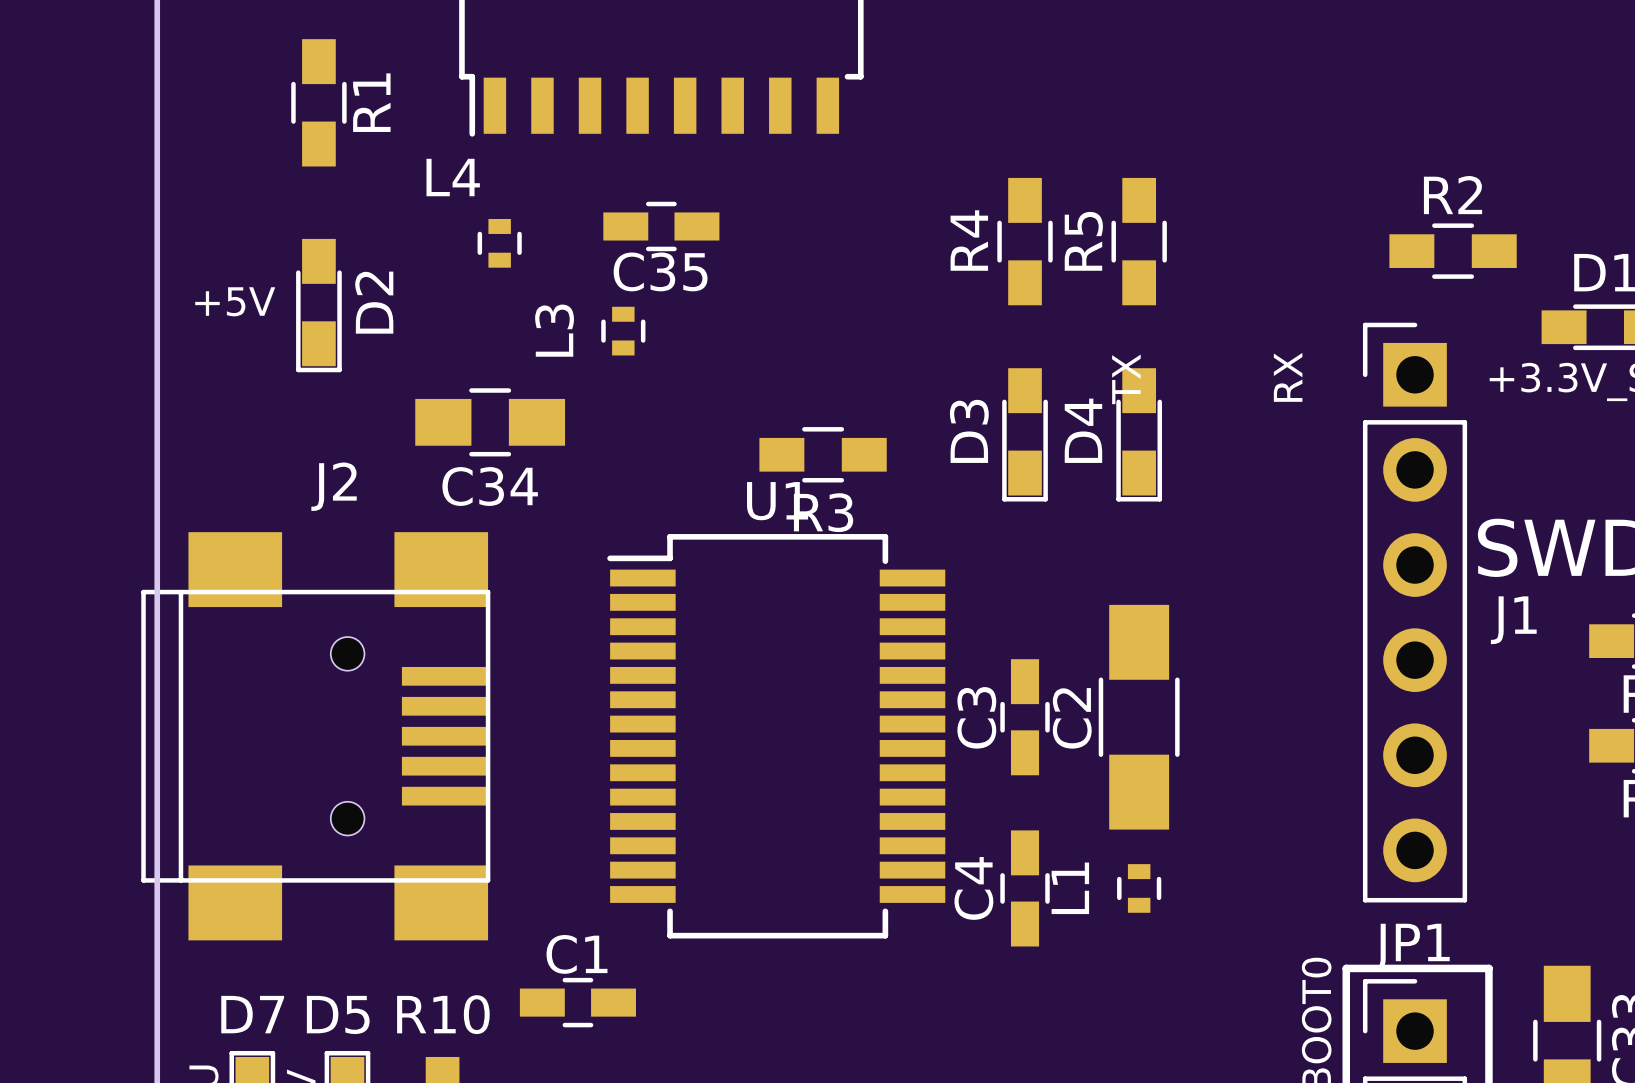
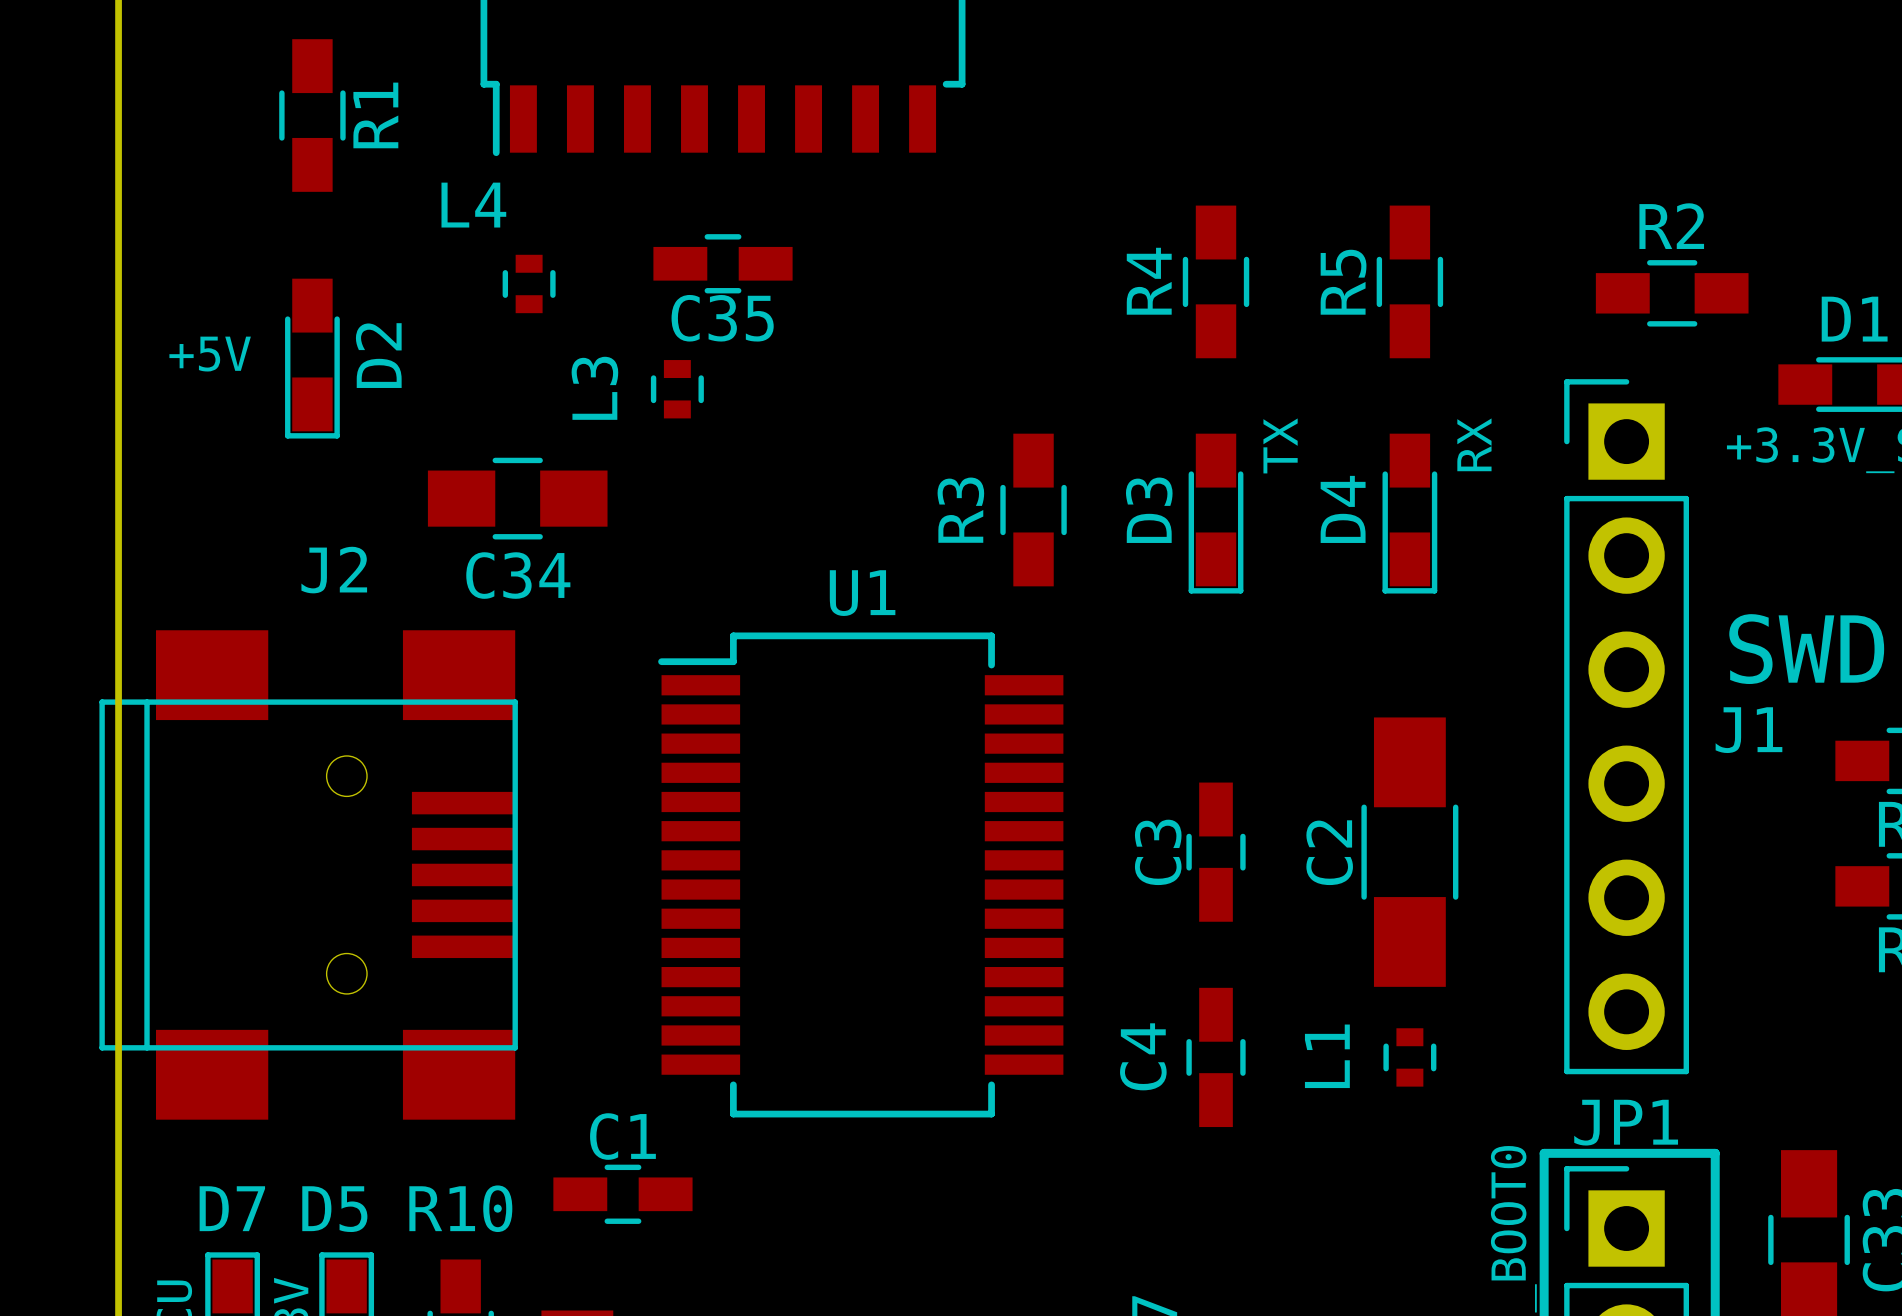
R4 position: (1025, 241) -> (1216, 281)
R5 position: (1139, 241) -> (1409, 281)
D3 position: (1025, 434) -> (1216, 513)
D4 position: (1139, 434) -> (1409, 513)
R3 rotation: 0° (823, 454) -> 90° clockwise (1033, 510)
R3 position: (823, 454) -> (1033, 510)
C3 position: (1025, 717) -> (1216, 852)
C2 position: (1139, 717) -> (1409, 852)
C4 name position: C4 (973, 888) -> C4 (1143, 1056)
C4 position: (1025, 888) -> (1216, 1057)
L1 position: (1139, 888) -> (1409, 1057)

